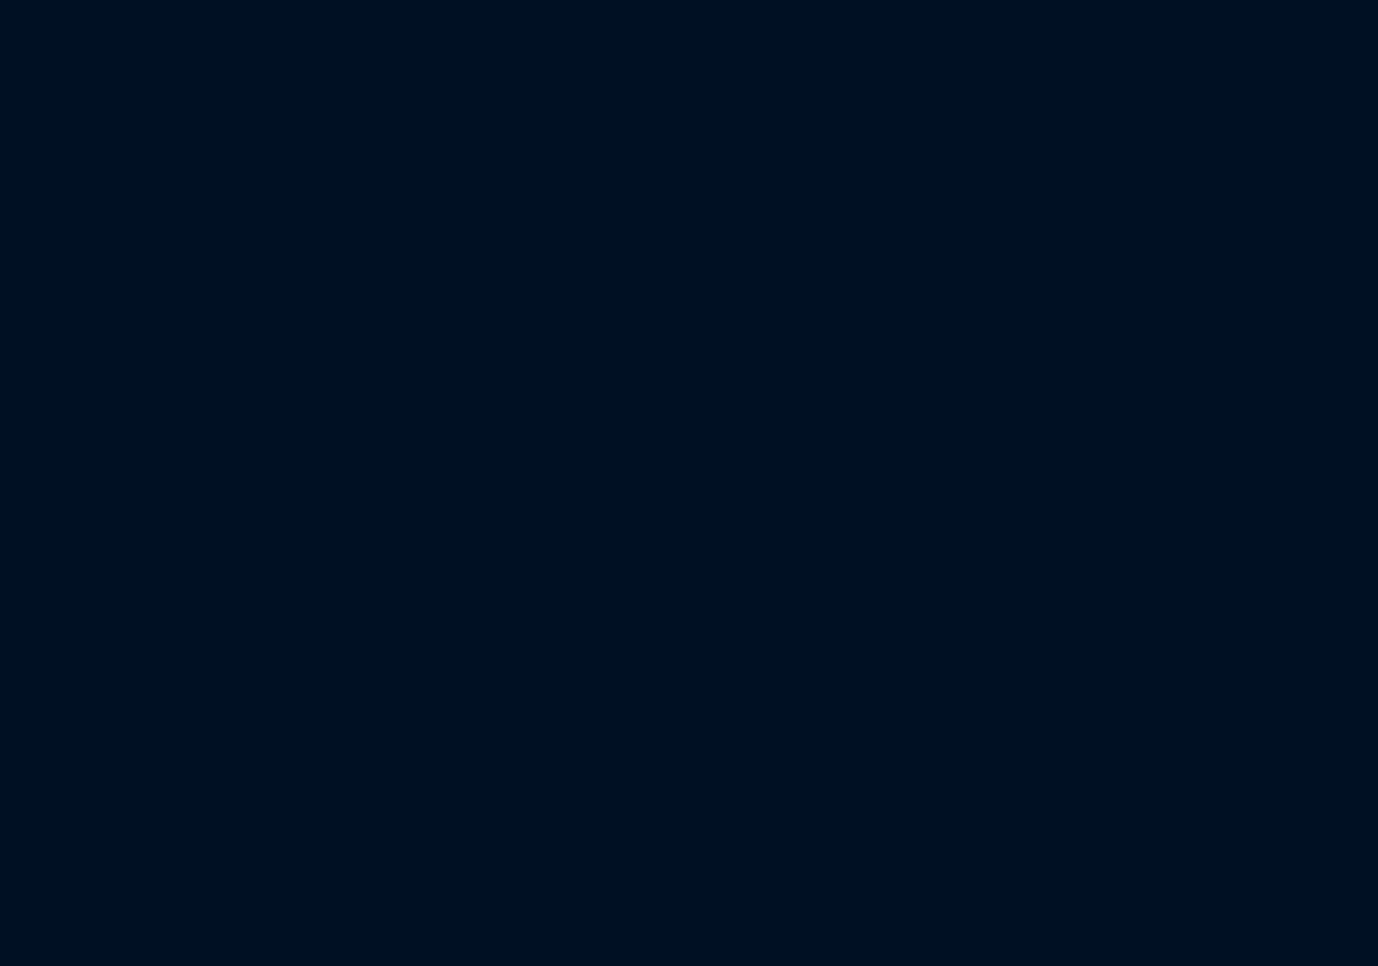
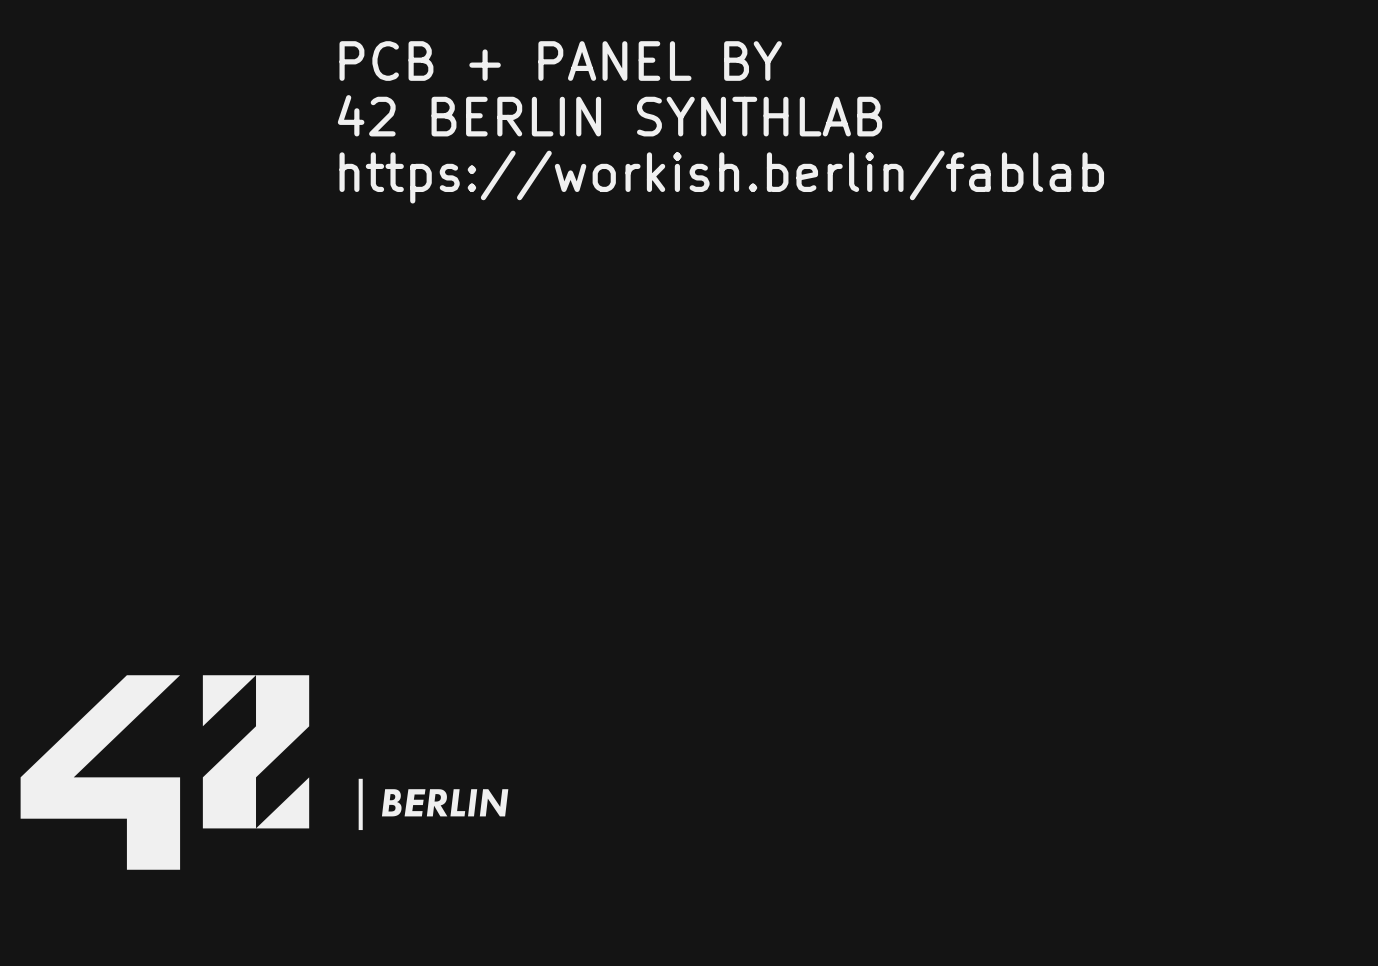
text: none -> PCB + PANEL BY (560, 61)
text: none -> 42 BERLIN SYNTHLAB (610, 115)
text: none -> https://workish.berlin/fablab (721, 177)
drawing: none -> [20, 675, 310, 870]
drawing: none -> [358, 778, 509, 831]

